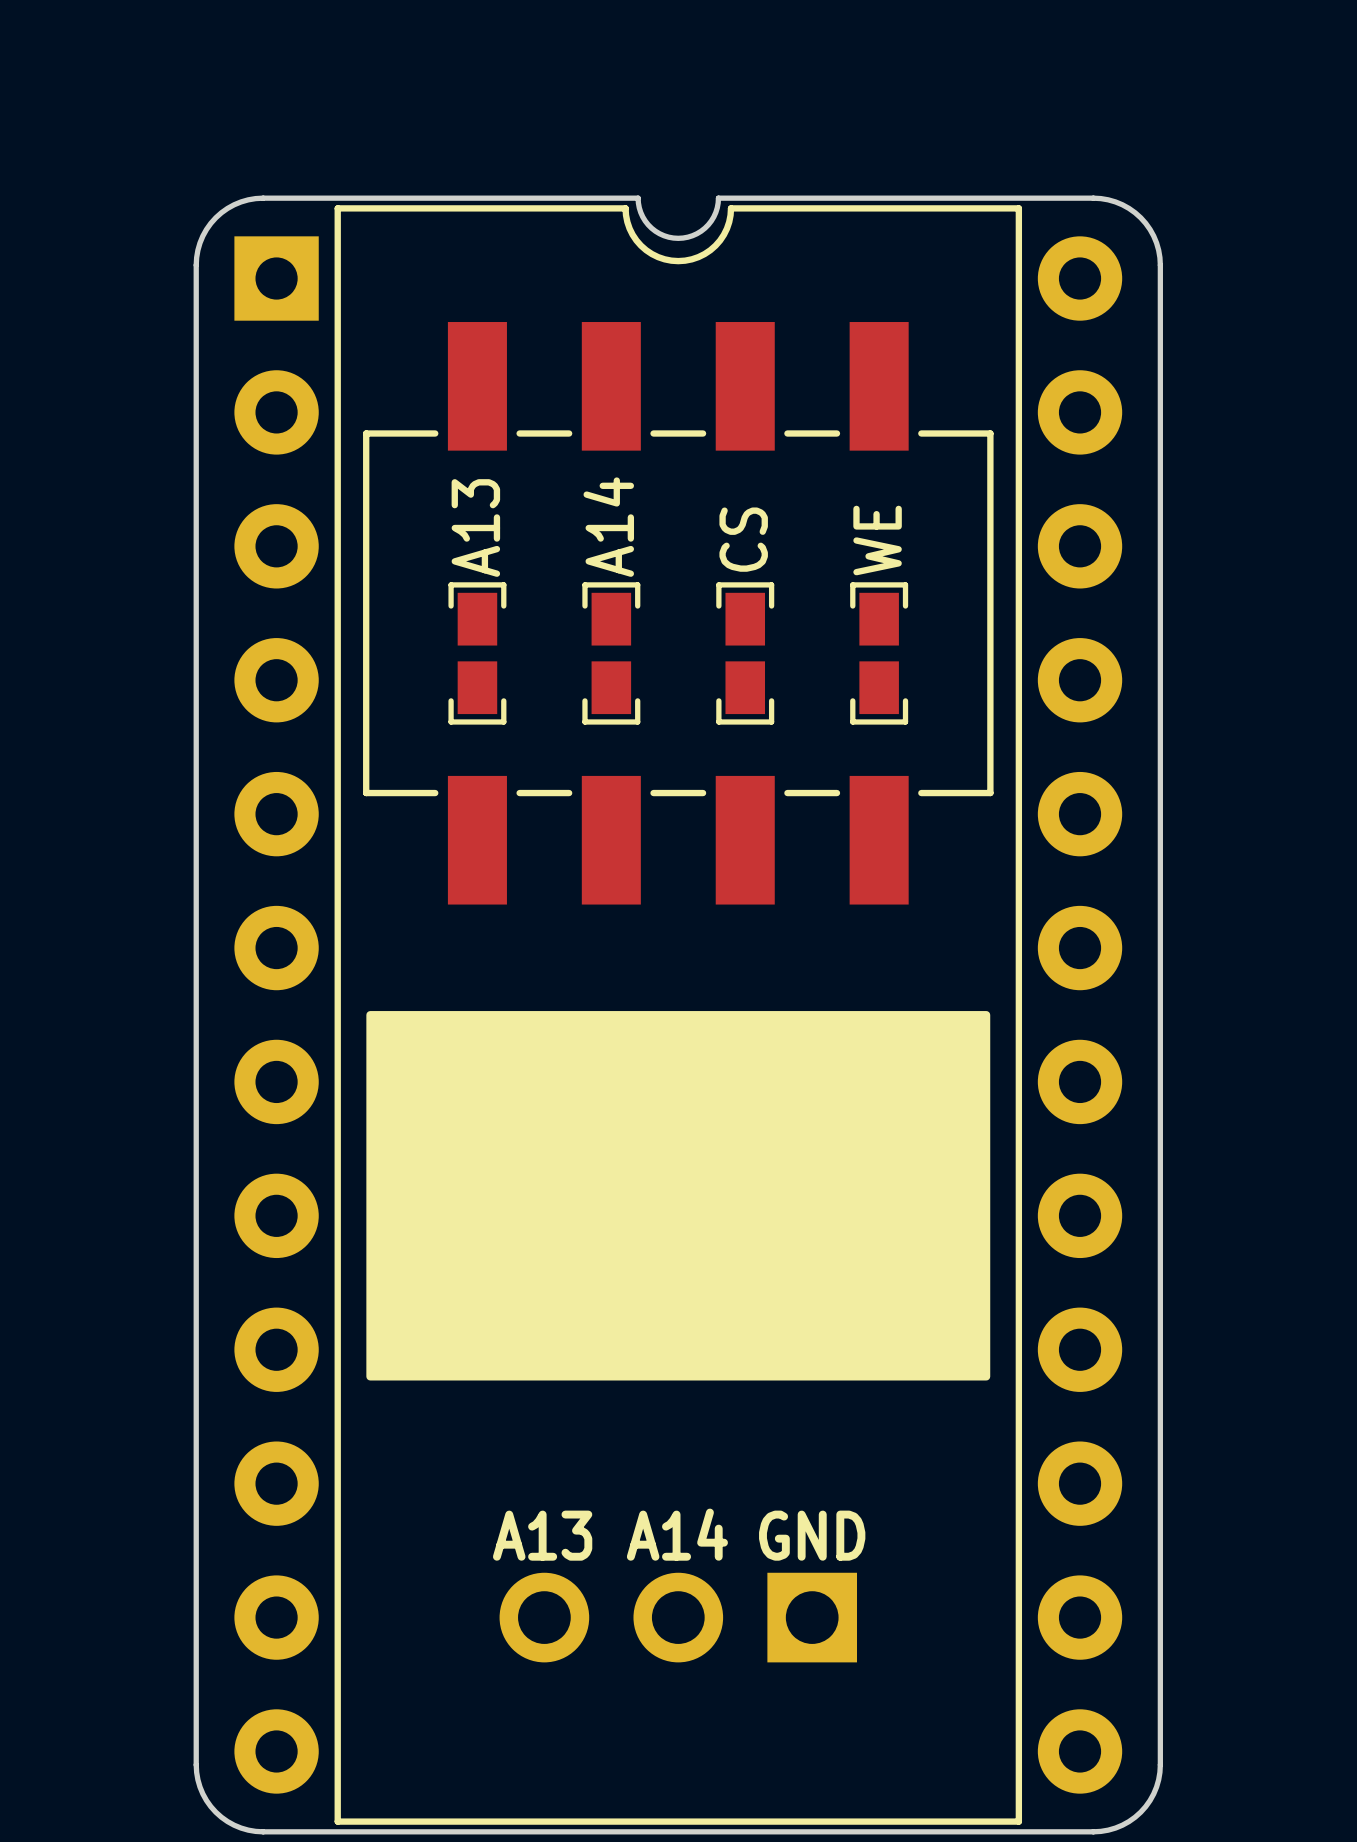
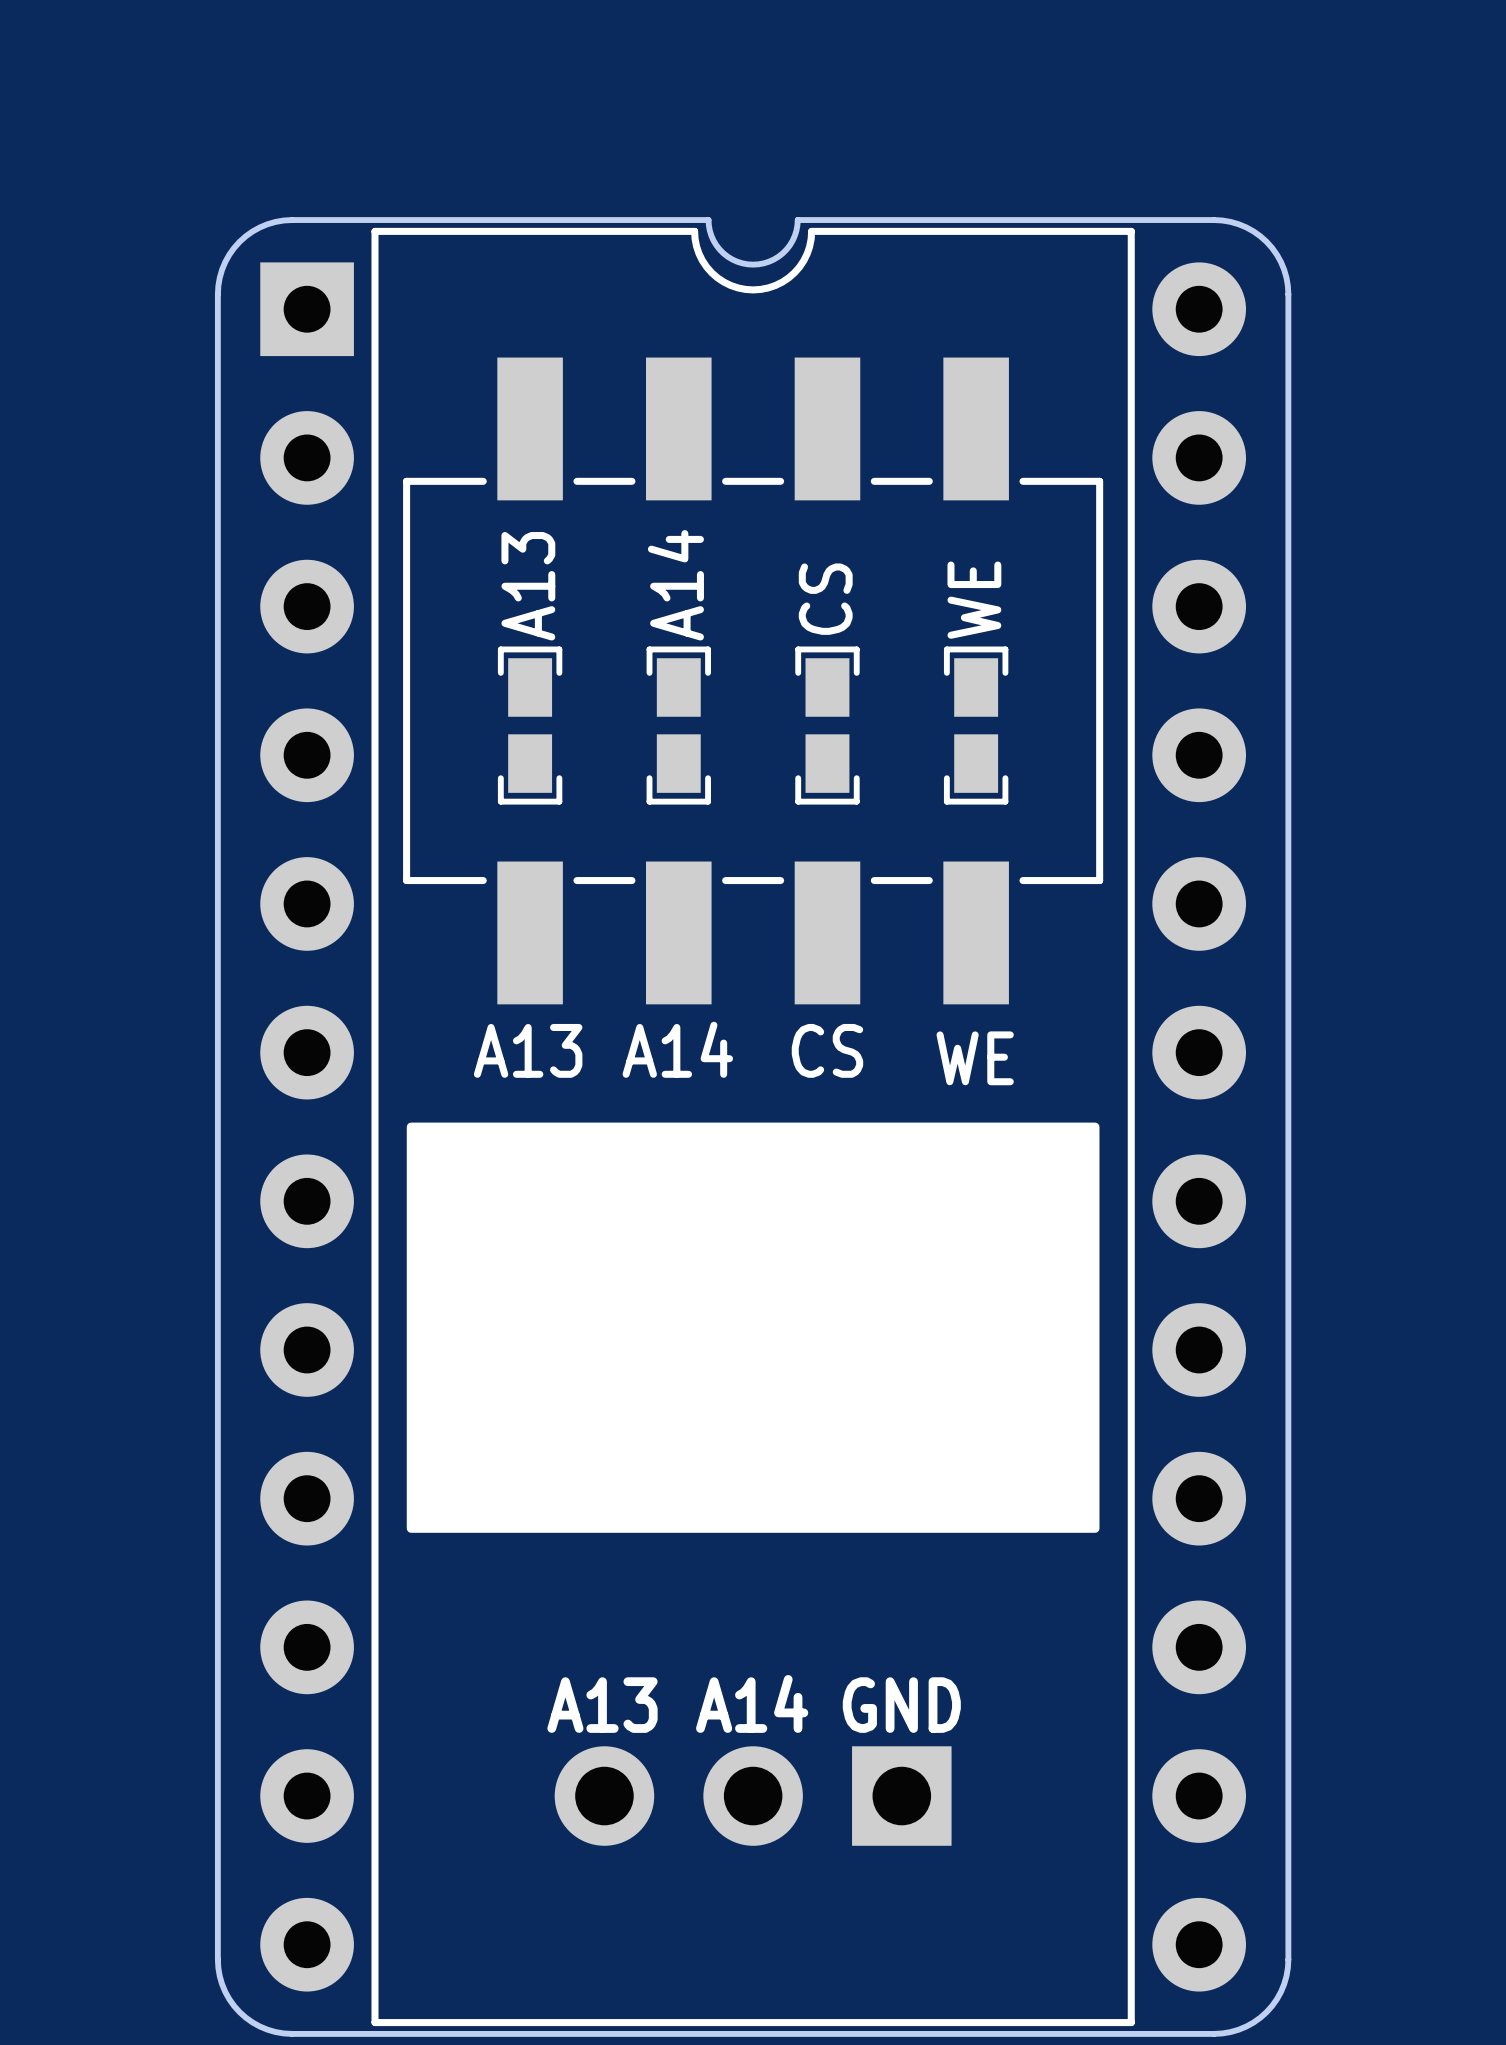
text: none -> A14 (677, 1049)
text: none -> A13 (528, 1050)
text: none -> CS (827, 1050)
text: none -> WE (975, 1058)

